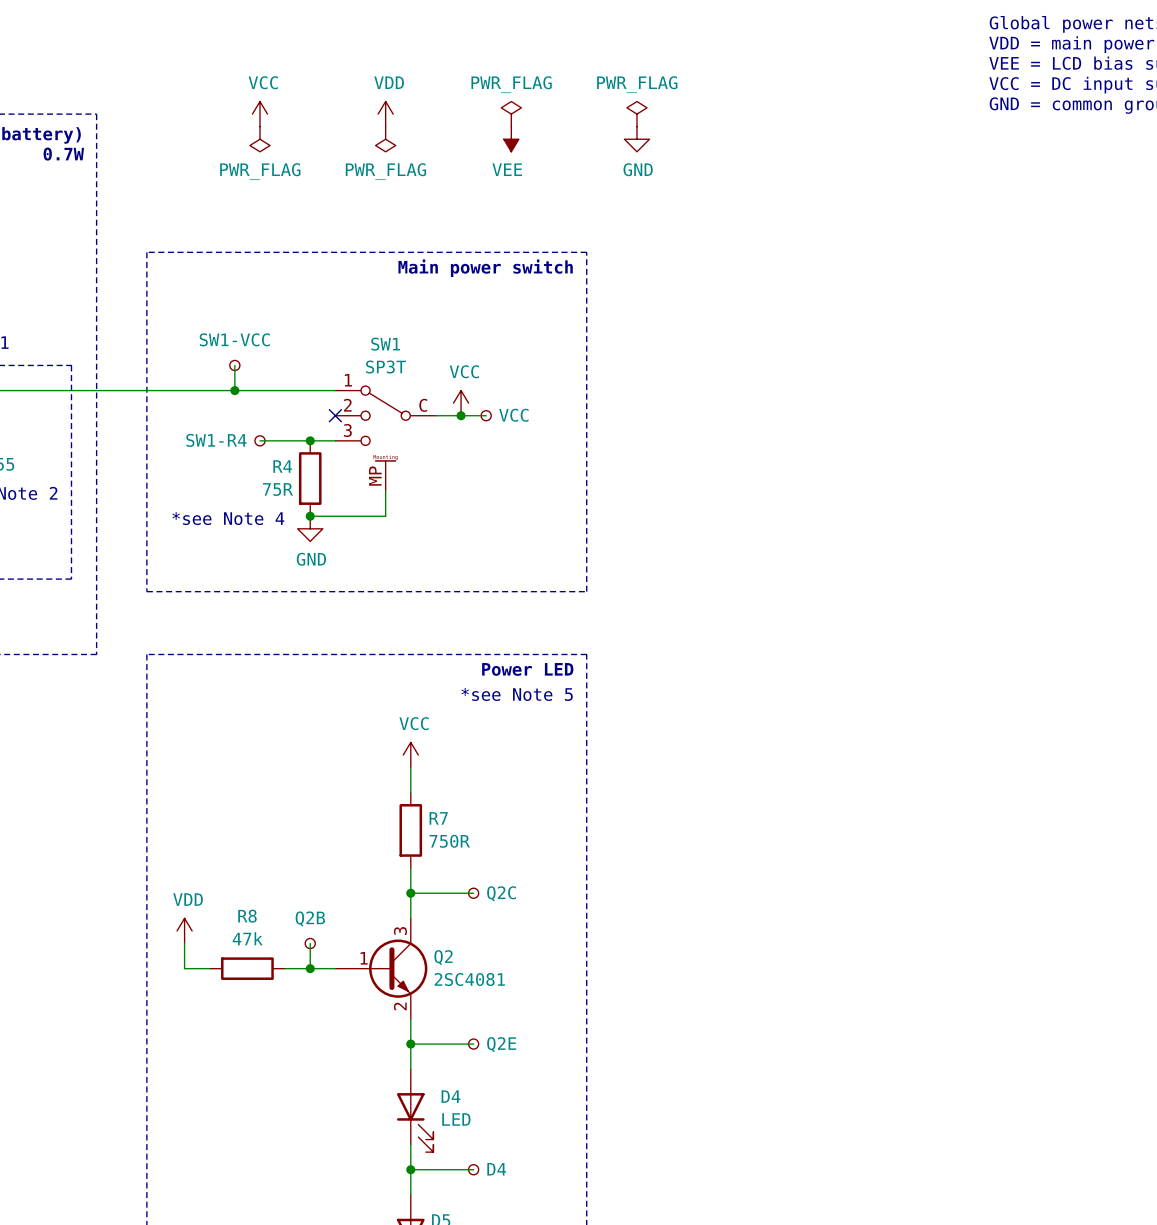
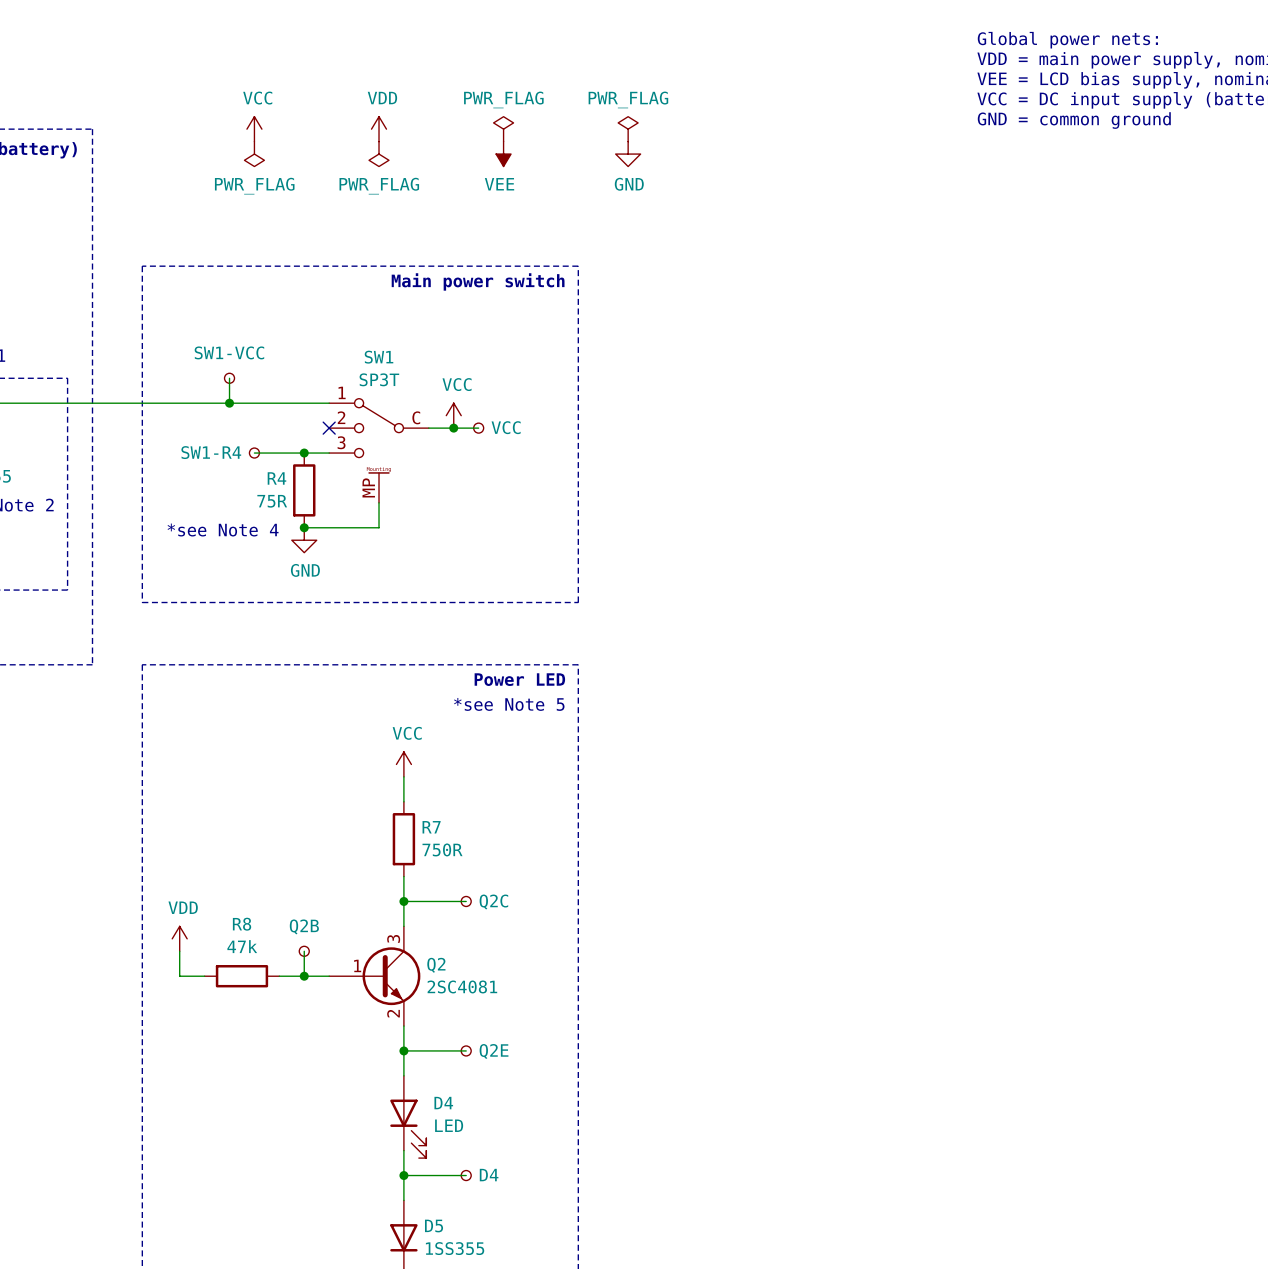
text: 0.7W (63, 154) -> none

